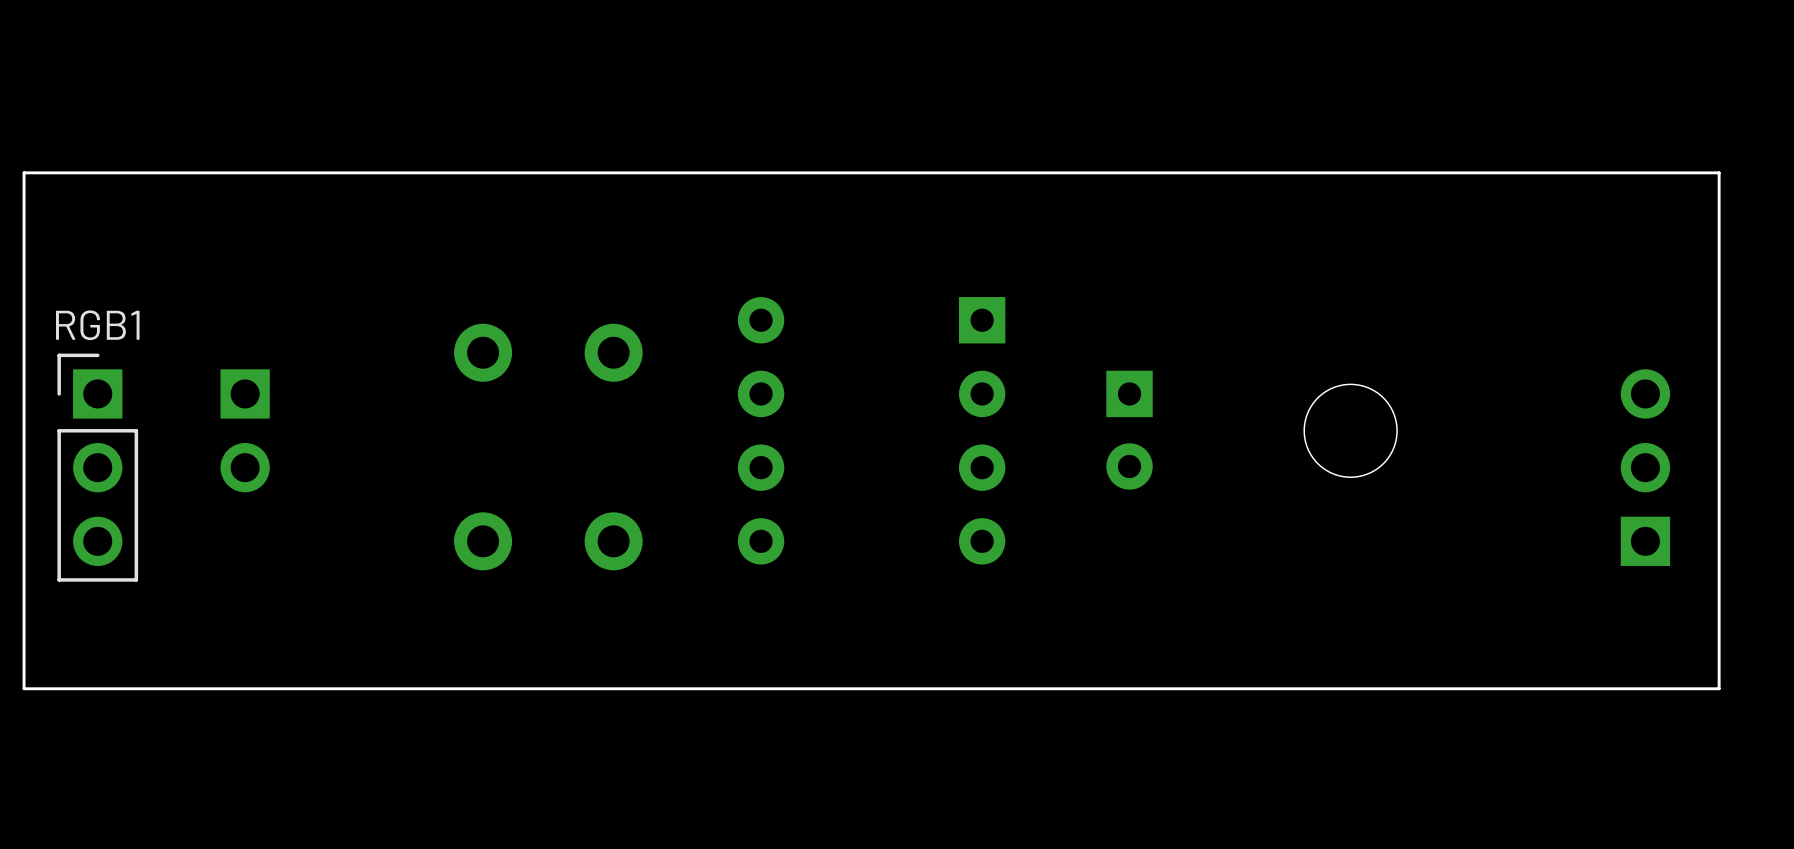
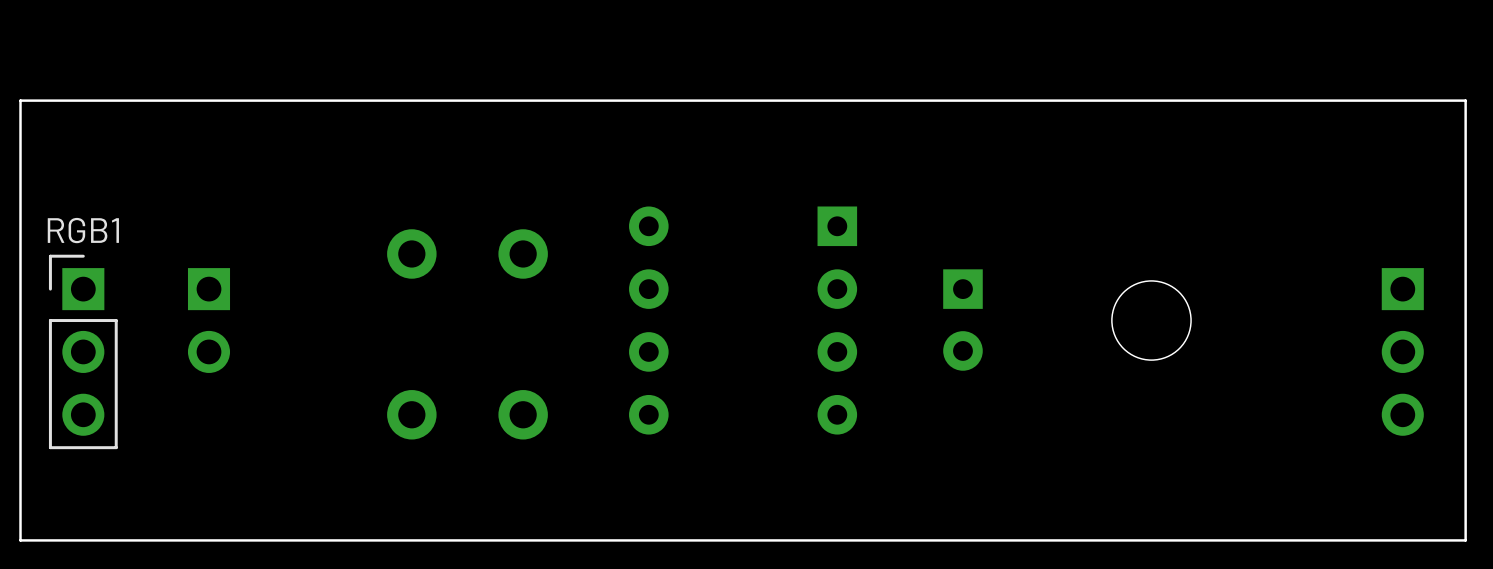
part rotation: 0° (1645, 467) -> 180° (1402, 351)

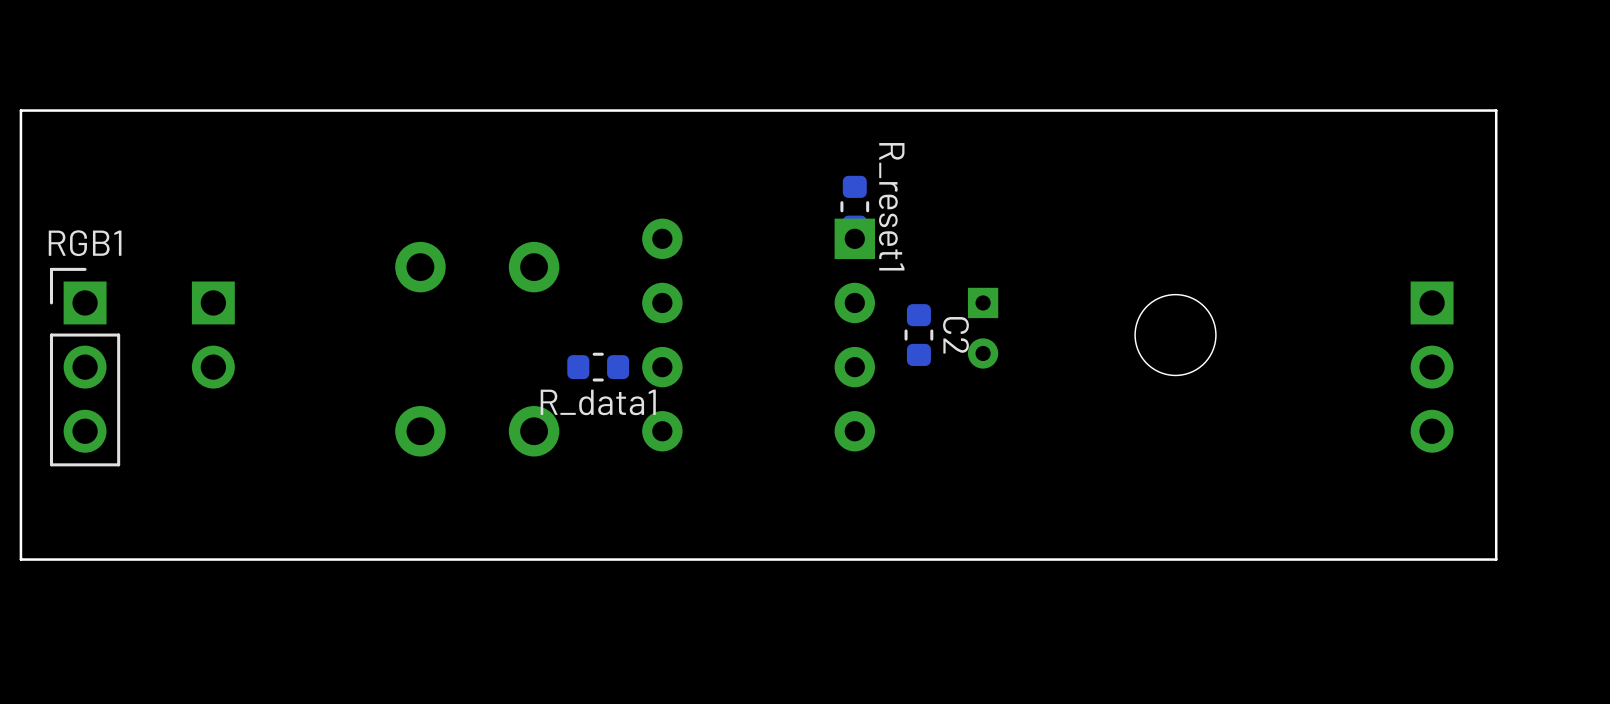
R_reset1: none -> (854, 206)
part footprint: [943, 269, 983, 371] -> [967, 287, 999, 369]
C2: none -> (918, 335)
R_data1: none -> (598, 367)

